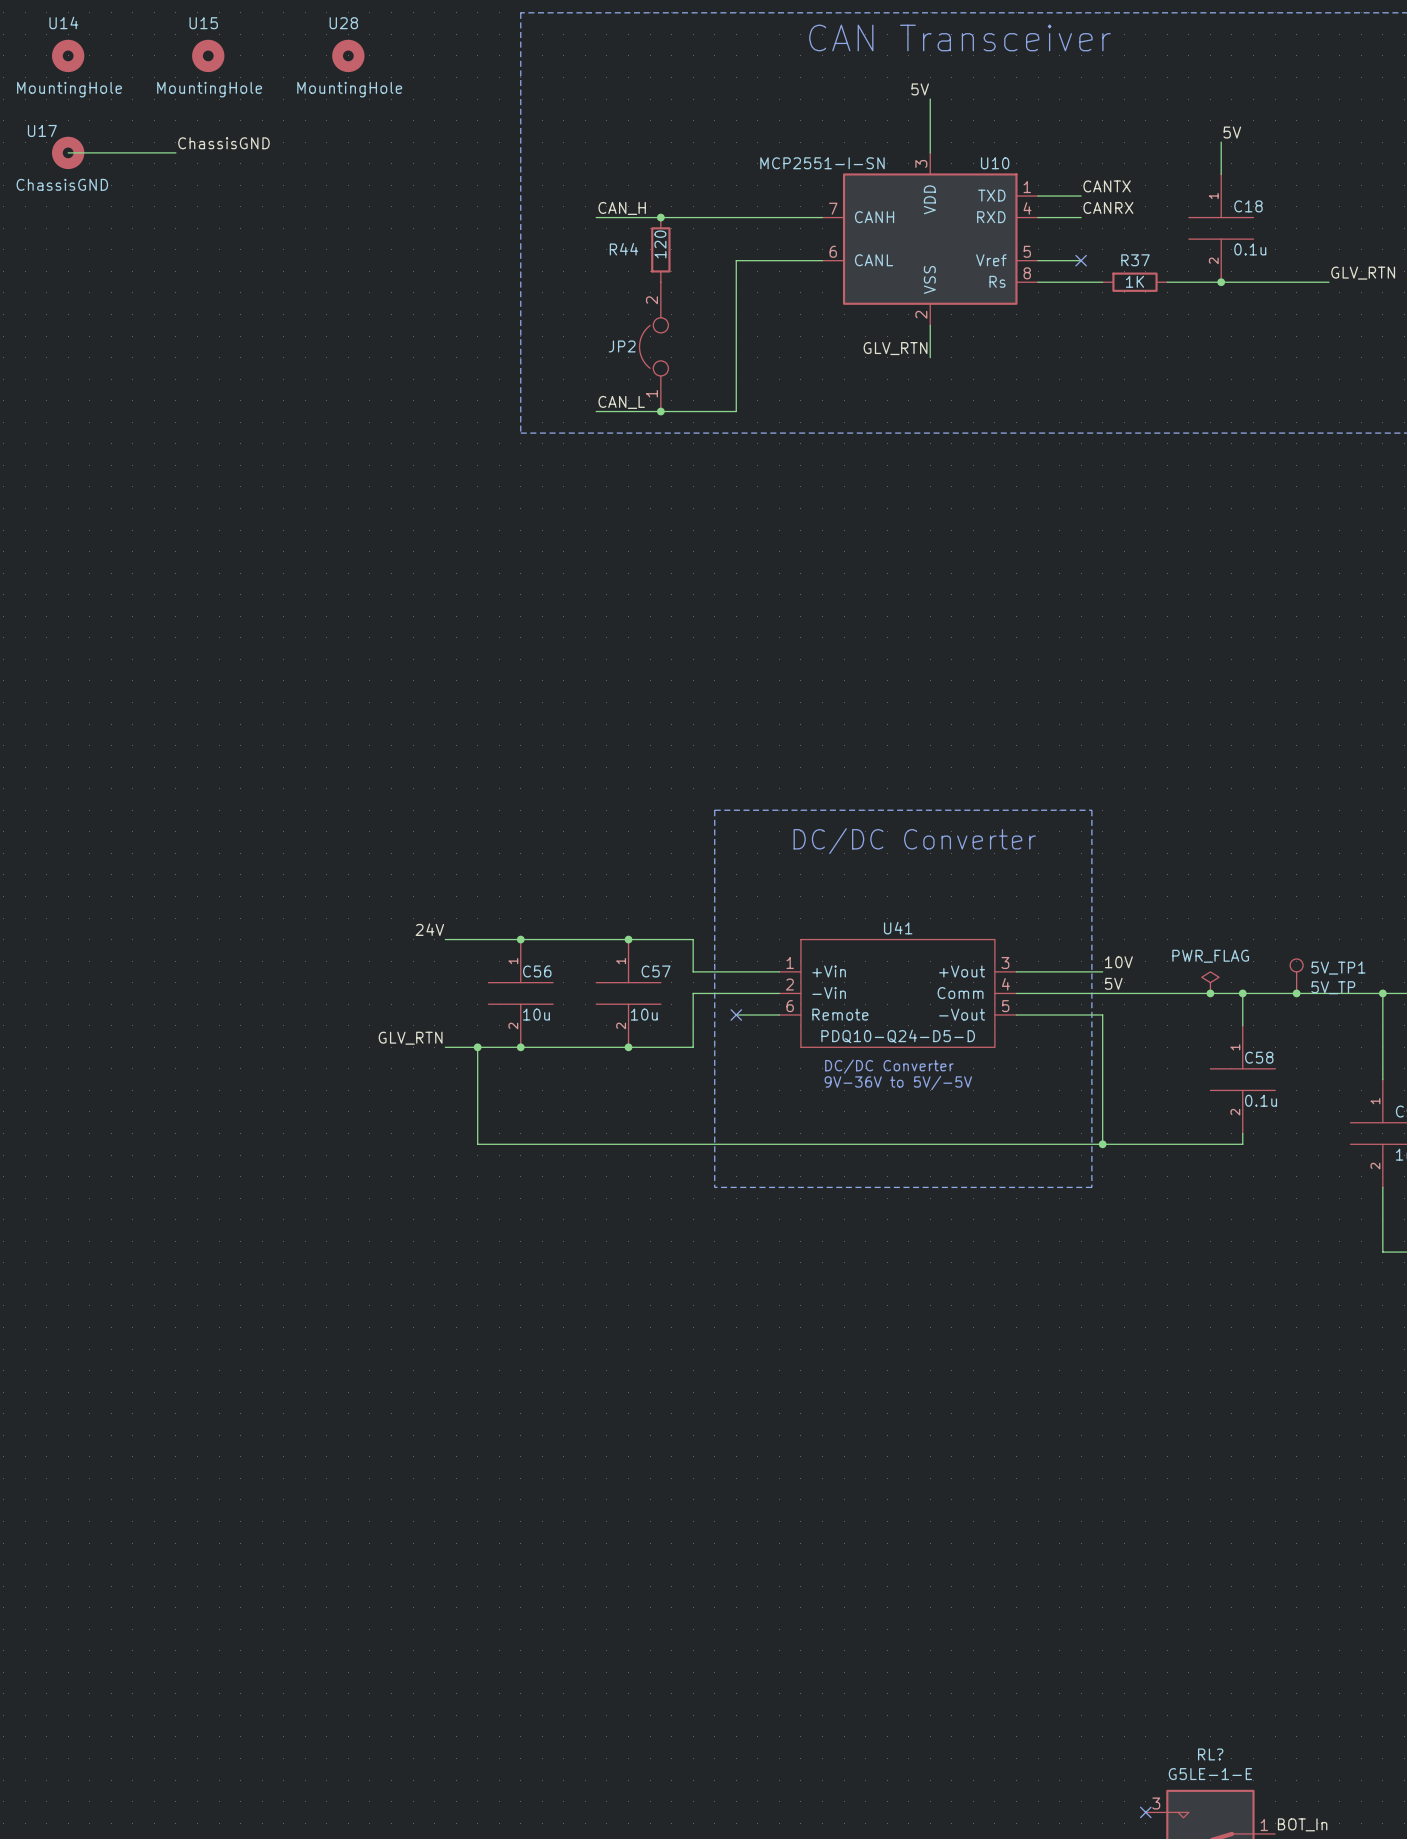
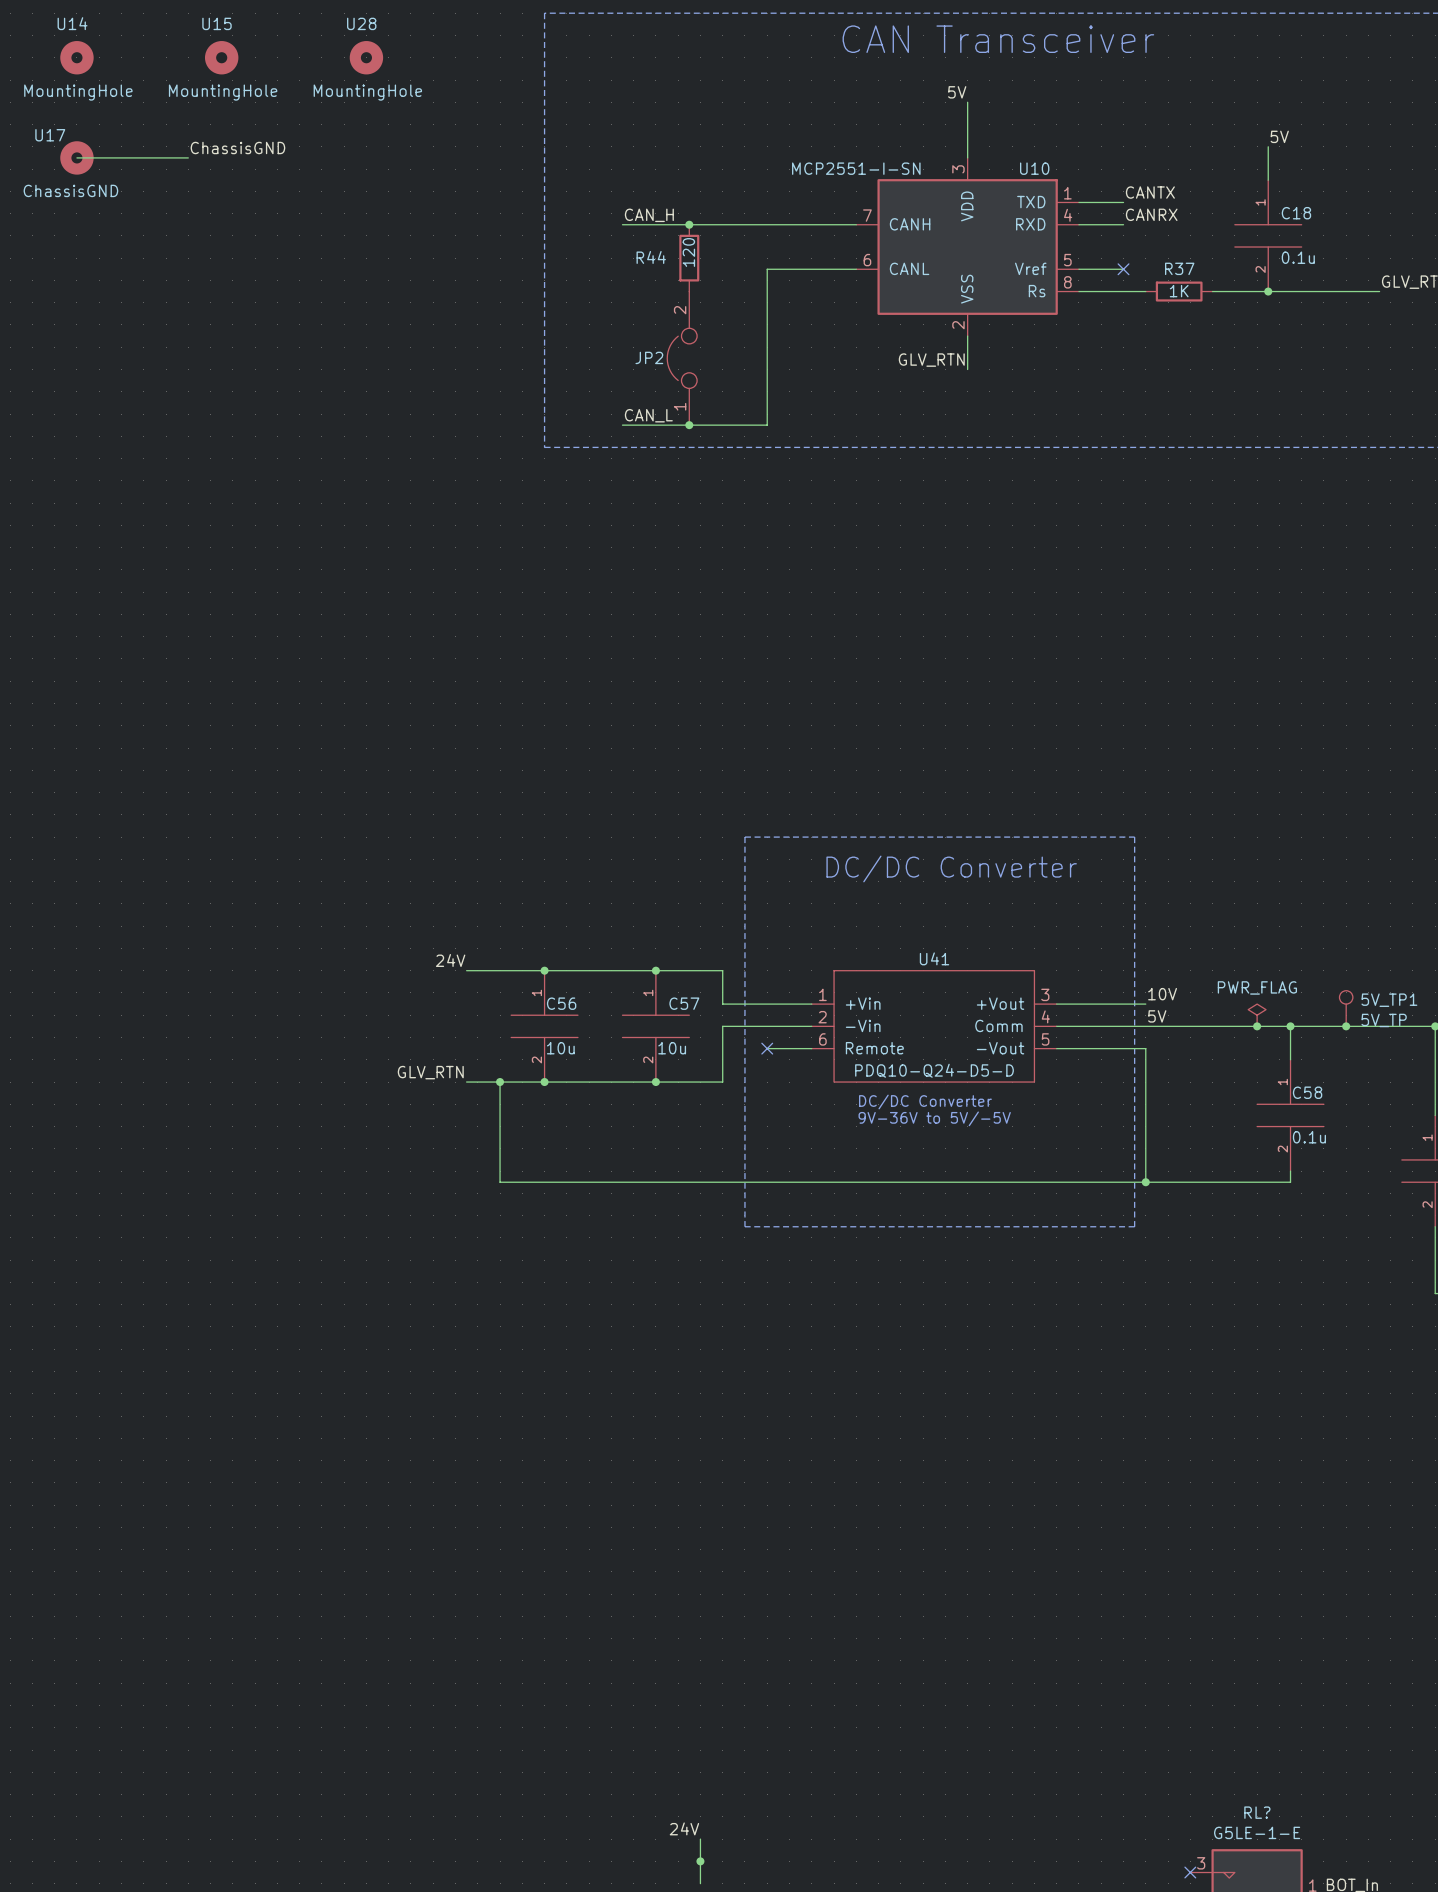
label: none -> 24V (684, 1828)
wire: none -> (700, 1839) (700, 1883)
junction: none -> (700, 1861)

